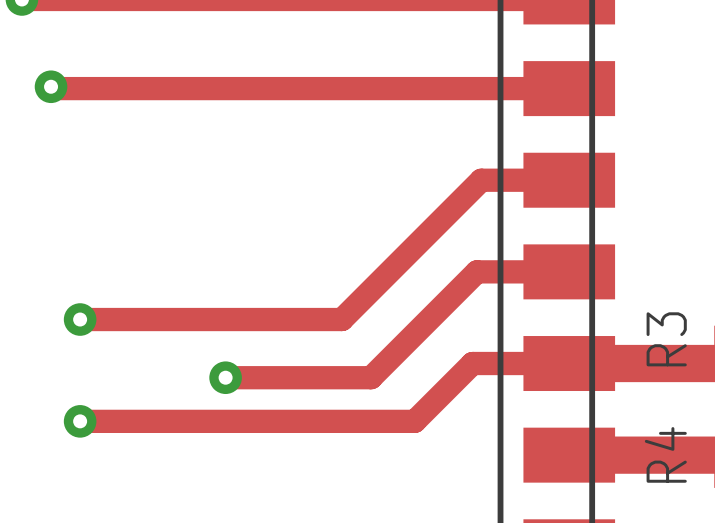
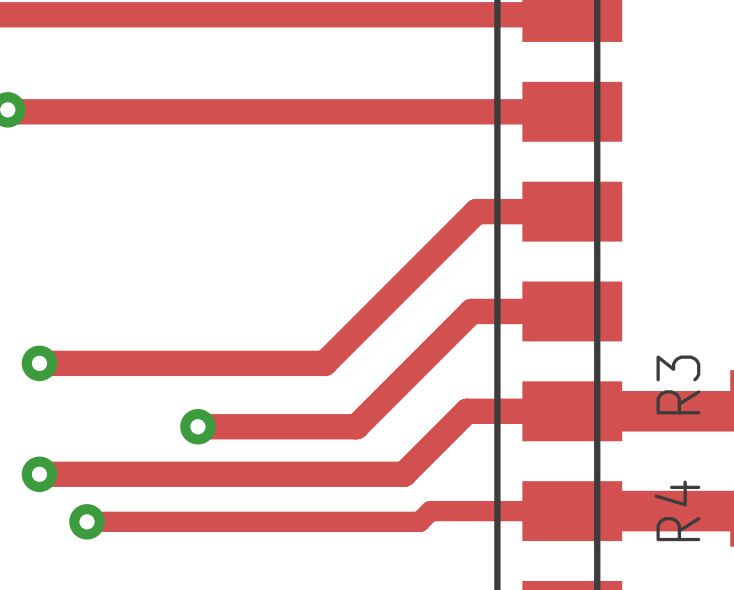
track: none -> (572, 511) (430, 511) (419, 521) (87, 521)
via: none -> (87, 521)

